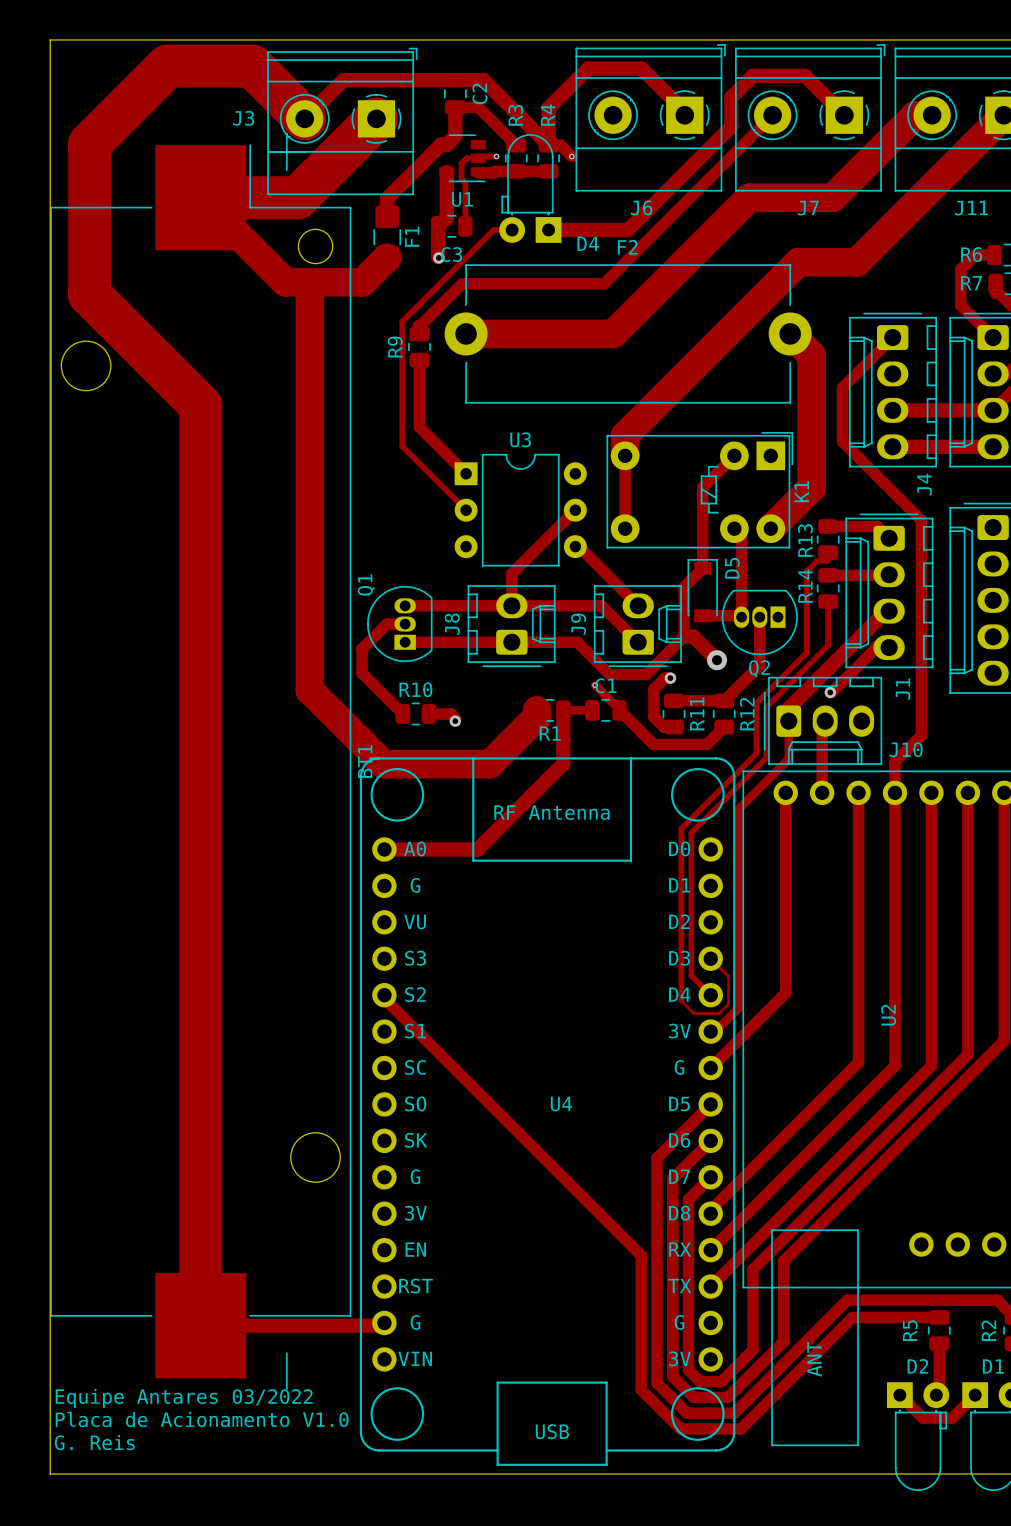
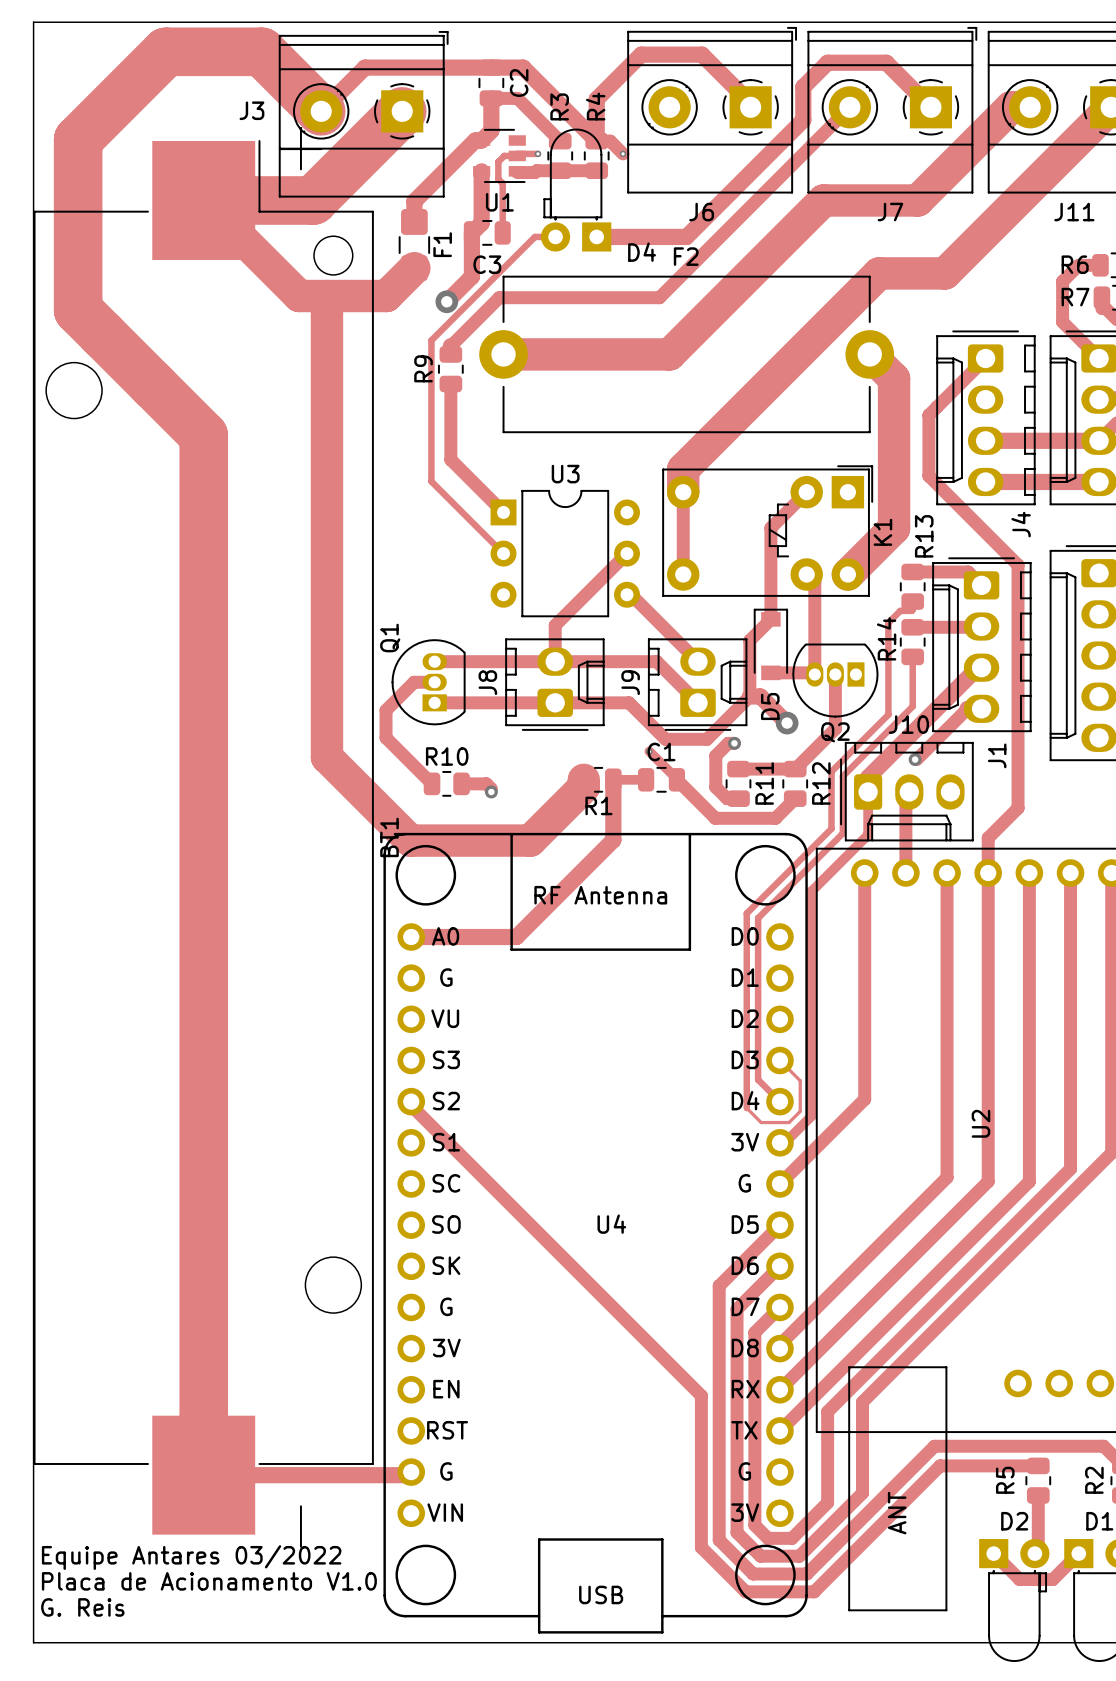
track: none -> (471, 267) (471, 276) (446, 301)
via: (438, 257) -> none
via: none -> (446, 301)
R13 name position: R13 (805, 540) -> R13 (924, 536)
D5 name position: D5 (732, 568) -> D5 (770, 706)
J10 name position: J10 (906, 749) -> J10 (908, 724)

